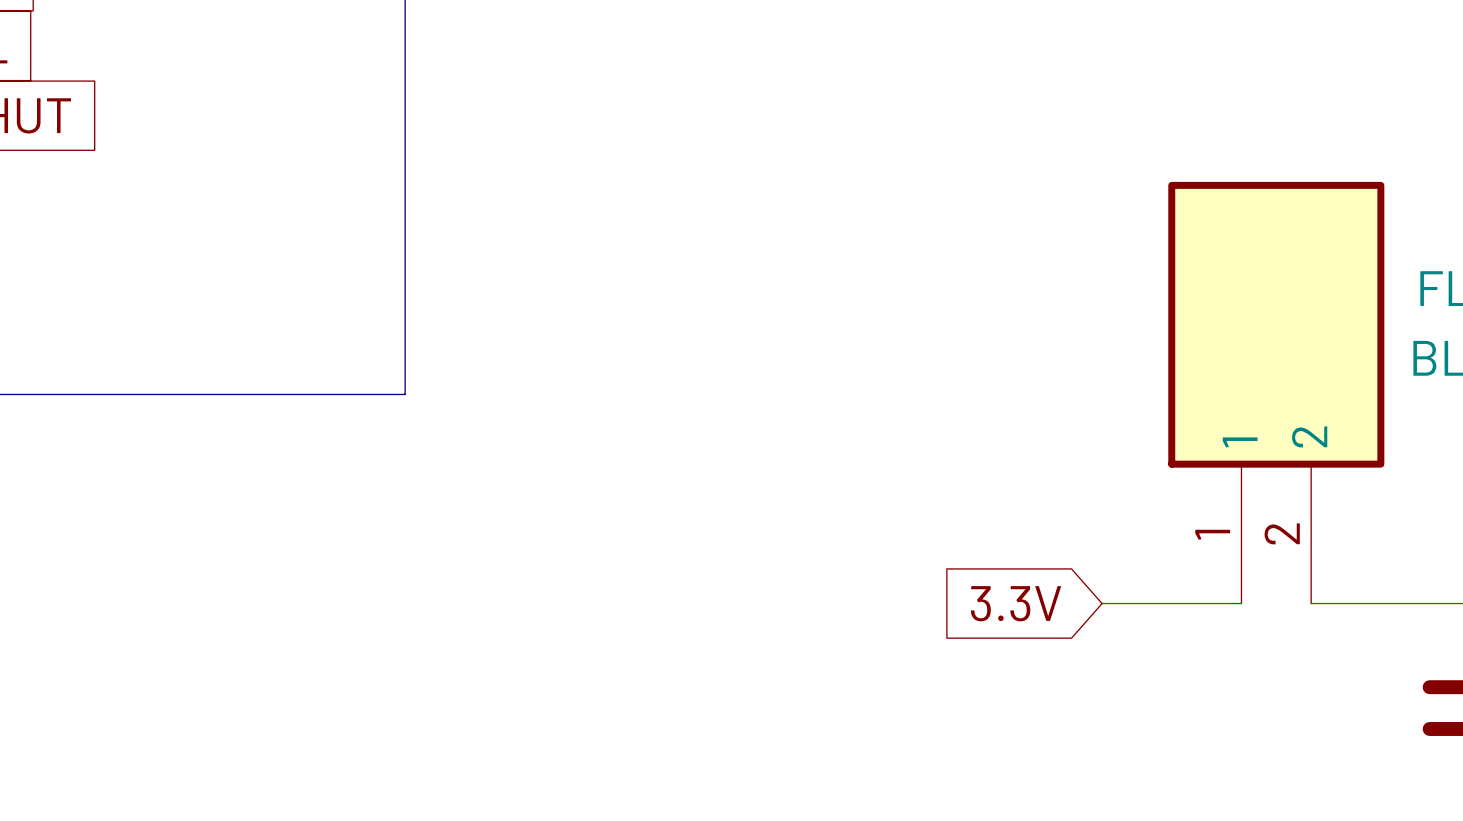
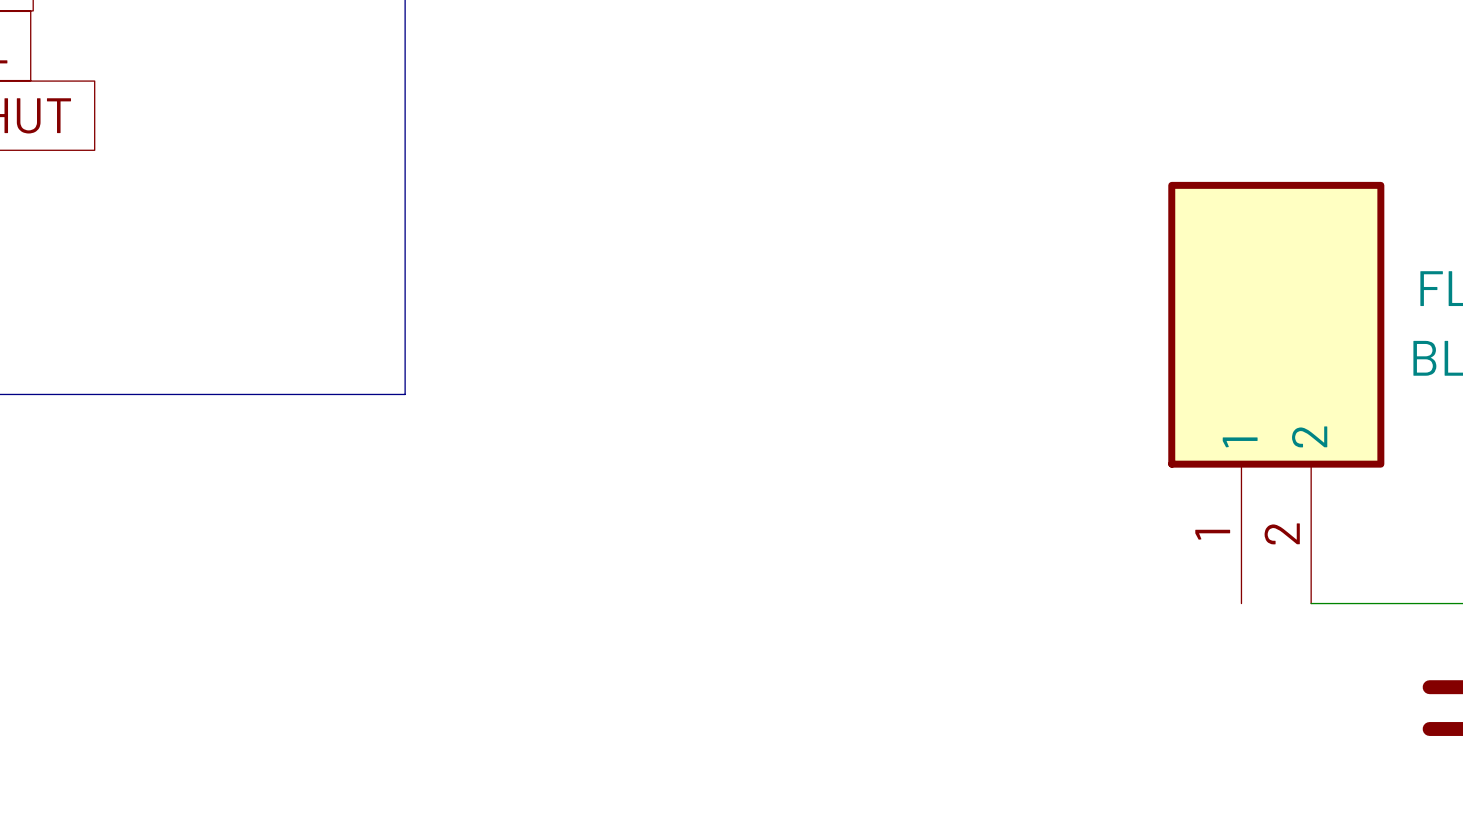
global label: 3.3V (1016, 603) -> none
wire: (1102, 603) (1241, 603) -> none

